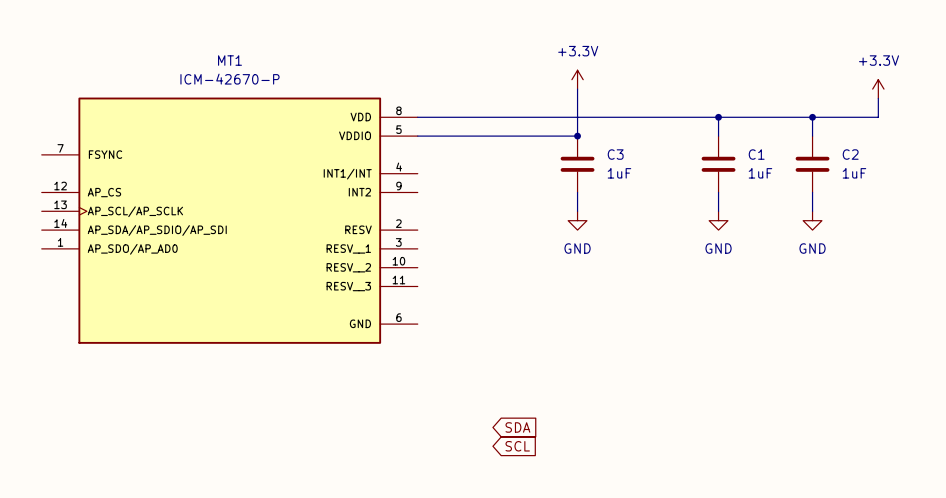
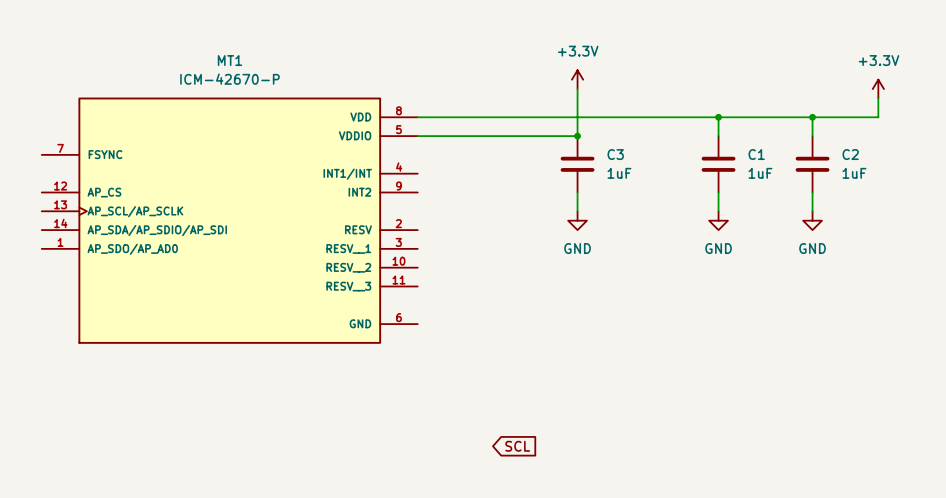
global label: SDA (517, 427) -> none

